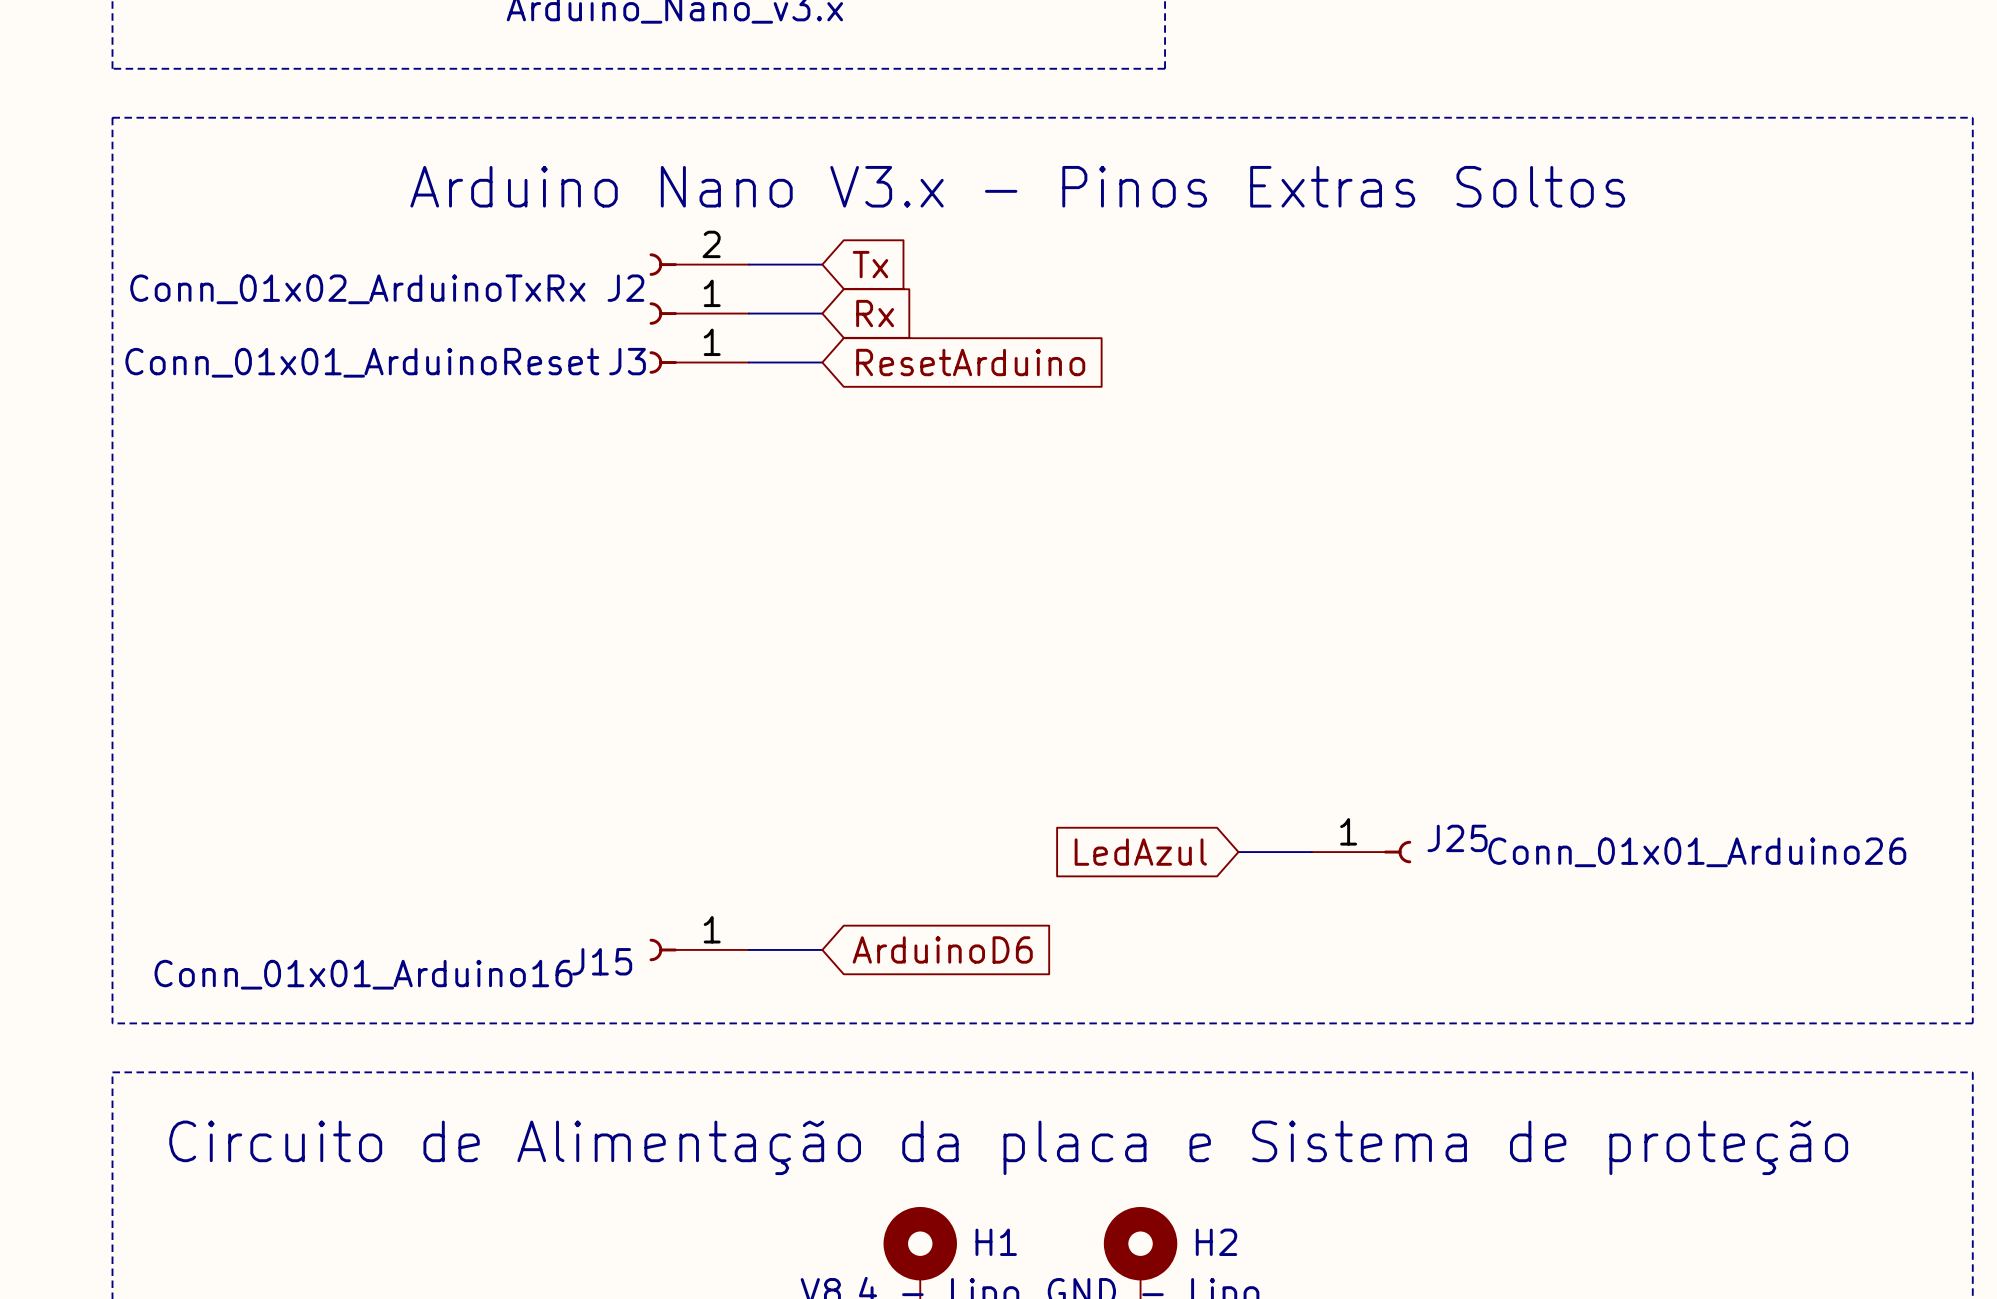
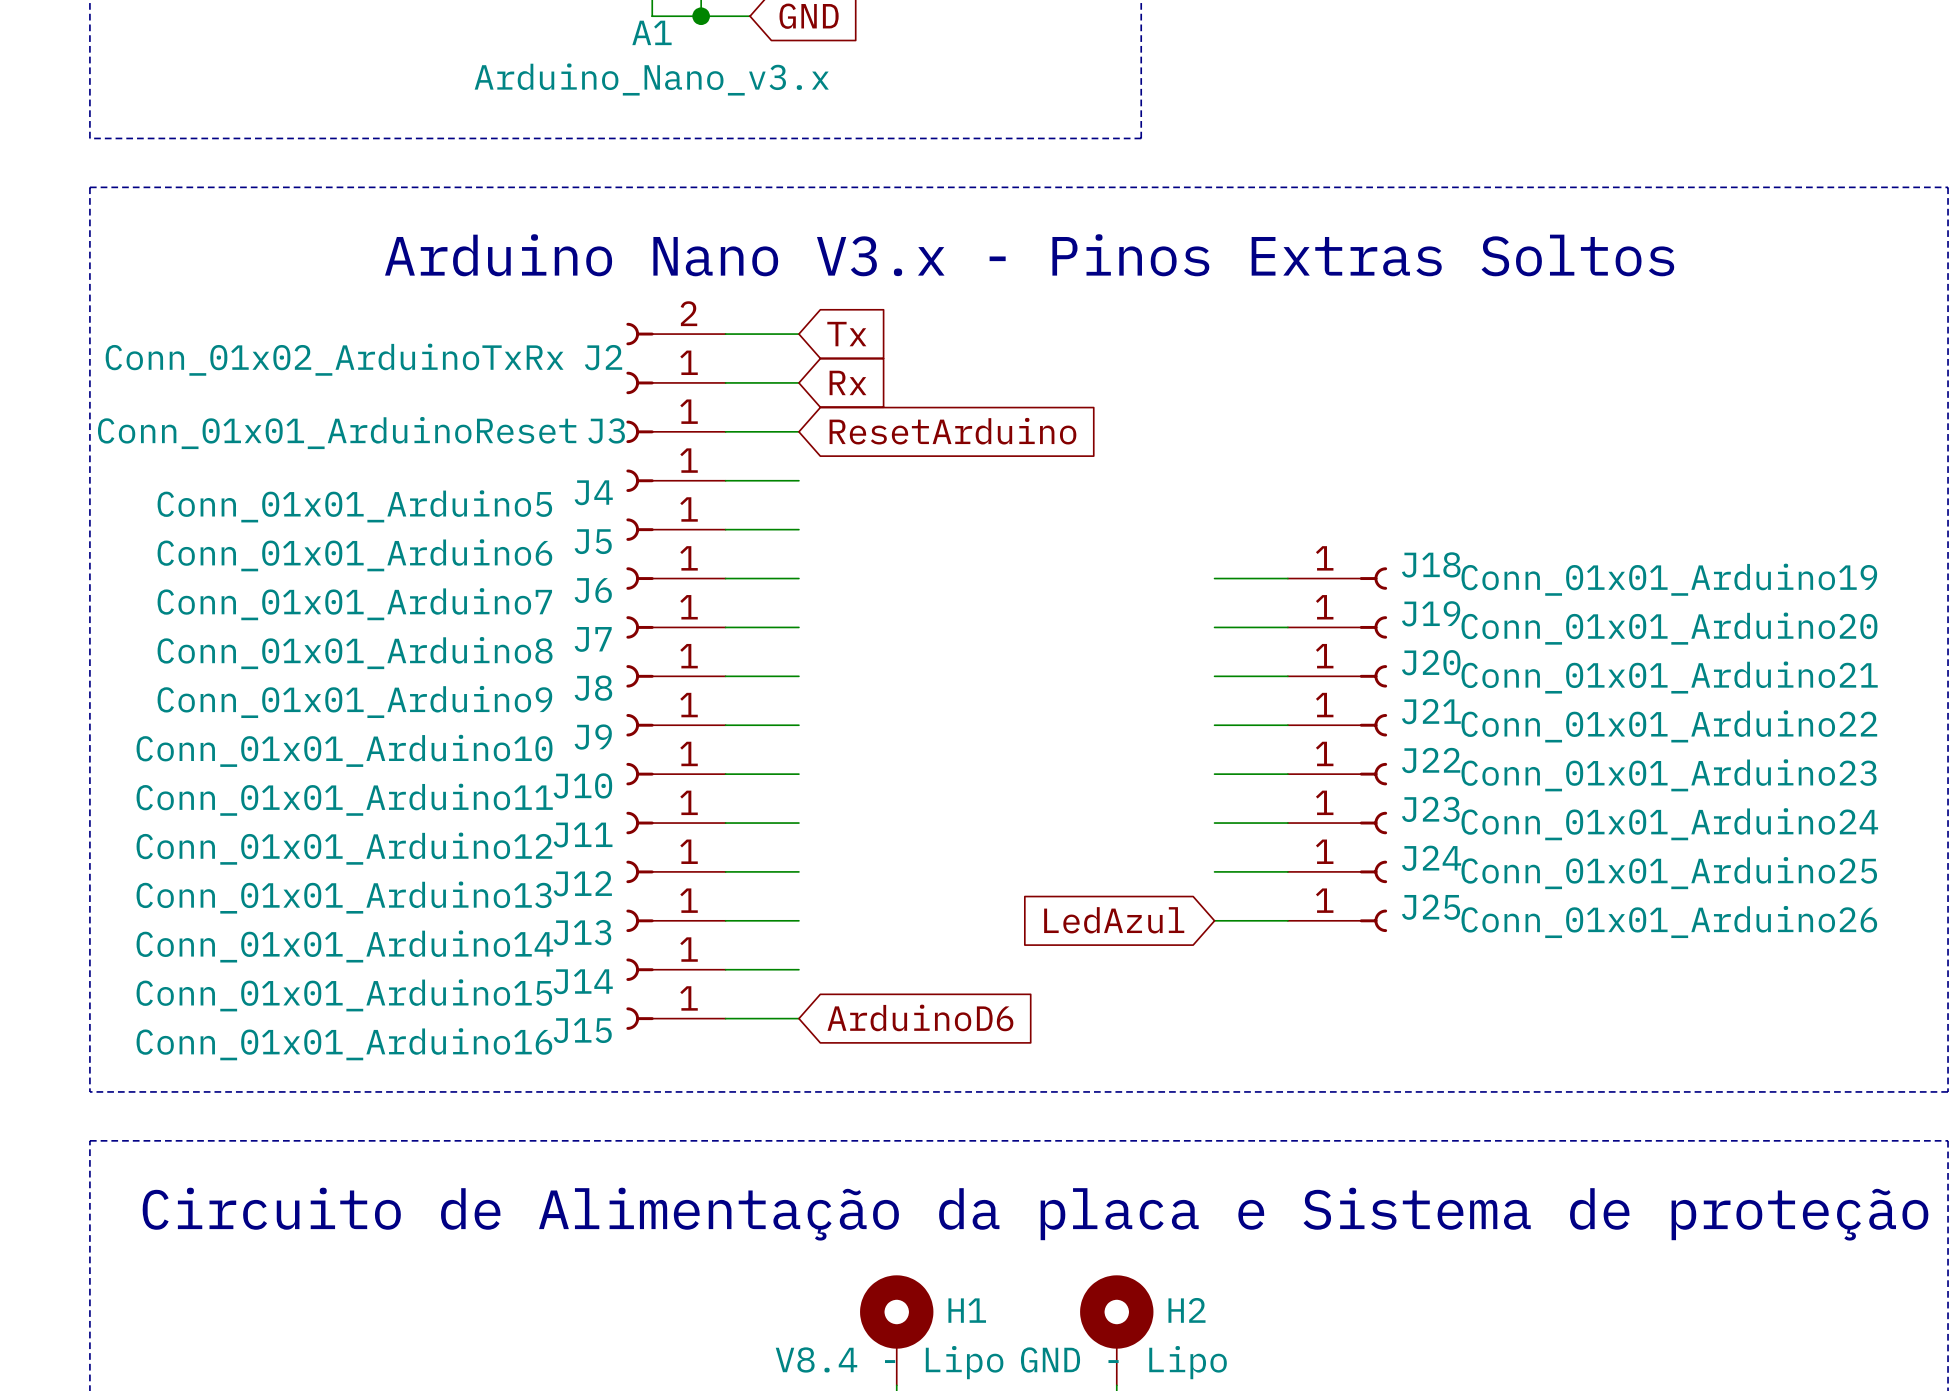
J4: none -> Conn_01x01_Arduino5 (675, 480)
wire: none -> (725, 480) (798, 480)
J5: none -> Conn_01x01_Arduino6 (675, 529)
wire: none -> (725, 529) (798, 529)
J6: none -> Conn_01x01_Arduino7 (675, 578)
wire: none -> (725, 578) (798, 578)
wire: none -> (1214, 578) (1287, 578)
J18: none -> Conn_01x01_Arduino19 (1337, 578)
J7: none -> Conn_01x01_Arduino8 (675, 627)
wire: none -> (725, 627) (798, 627)
wire: none -> (1214, 627) (1287, 627)
J19: none -> Conn_01x01_Arduino20 (1337, 627)
J8: none -> Conn_01x01_Arduino9 (675, 676)
wire: none -> (725, 676) (798, 676)
wire: none -> (1214, 676) (1287, 676)
J20: none -> Conn_01x01_Arduino21 (1337, 676)
J9: none -> Conn_01x01_Arduino10 (675, 725)
wire: none -> (725, 725) (798, 725)
wire: none -> (1214, 725) (1287, 725)
J21: none -> Conn_01x01_Arduino22 (1337, 725)
J10: none -> Conn_01x01_Arduino11 (675, 774)
wire: none -> (725, 774) (798, 774)
wire: none -> (1214, 774) (1287, 774)
J22: none -> Conn_01x01_Arduino23 (1337, 774)
J11: none -> Conn_01x01_Arduino12 (675, 823)
wire: none -> (725, 823) (798, 823)
wire: none -> (1214, 823) (1287, 823)
J23: none -> Conn_01x01_Arduino24 (1337, 823)
J12: none -> Conn_01x01_Arduino13 (675, 871)
wire: none -> (725, 871) (798, 871)
wire: none -> (1214, 871) (1287, 871)
J24: none -> Conn_01x01_Arduino25 (1337, 871)
J13: none -> Conn_01x01_Arduino14 (675, 920)
wire: none -> (725, 920) (798, 920)
J14: none -> Conn_01x01_Arduino15 (675, 969)
wire: none -> (725, 969) (798, 969)

